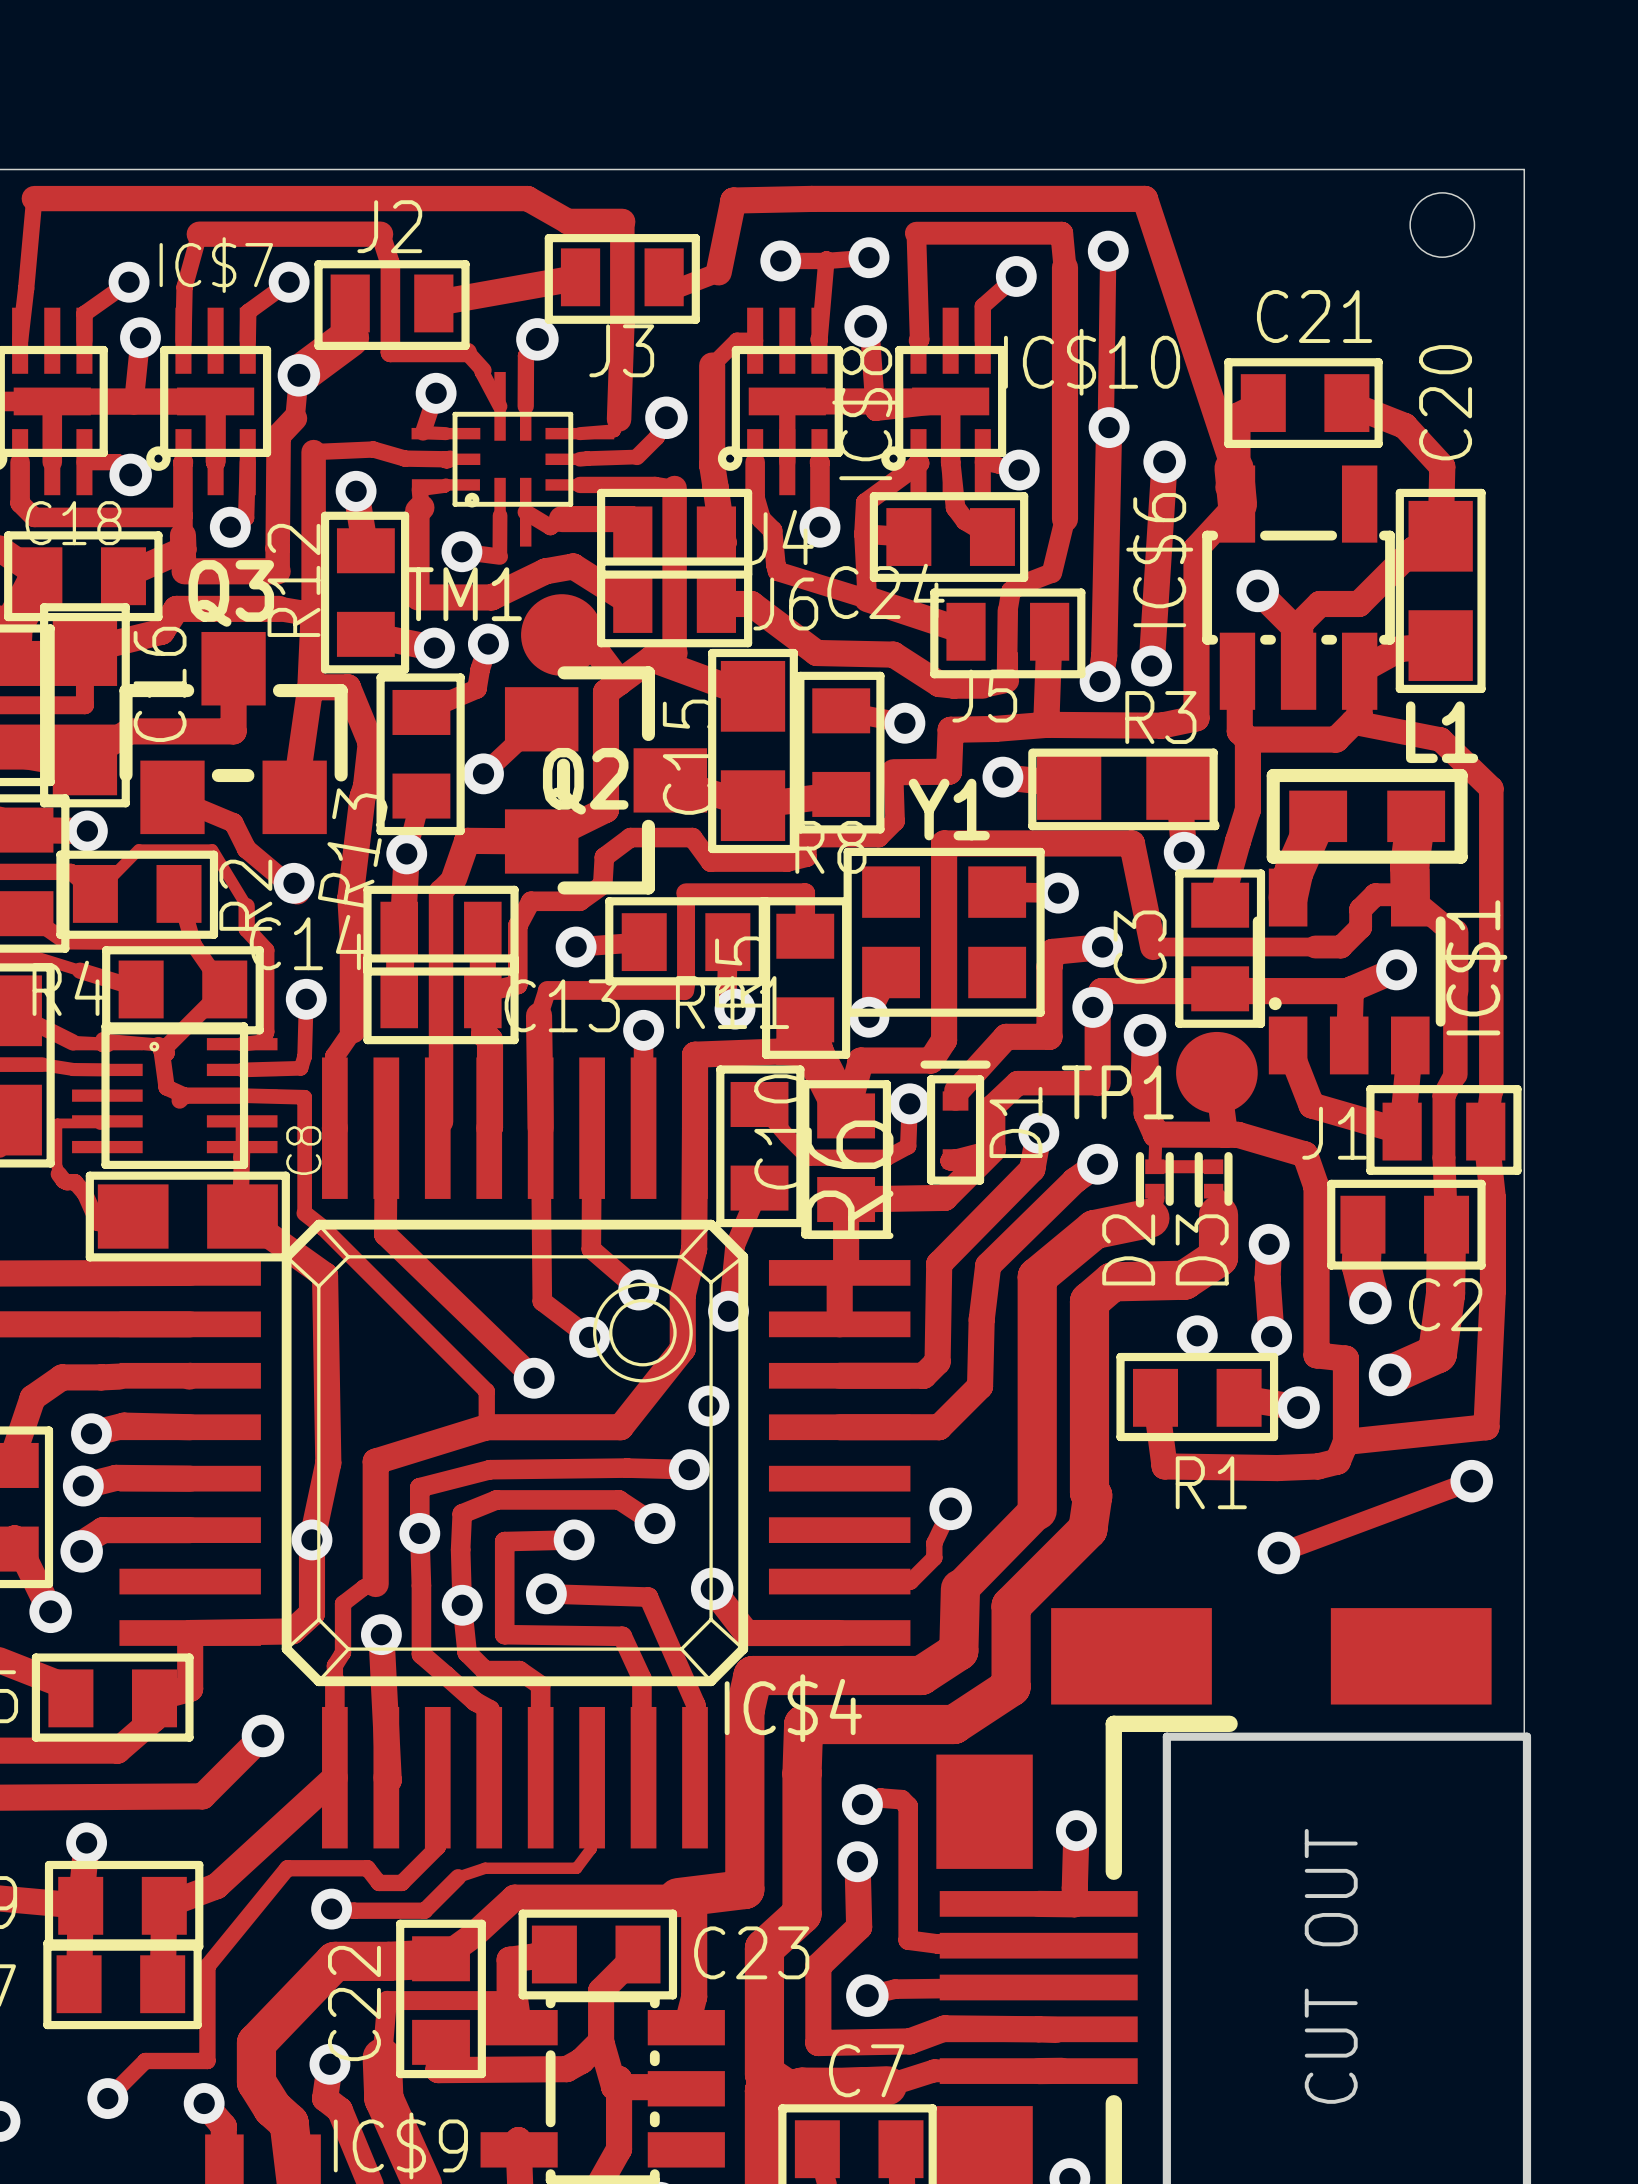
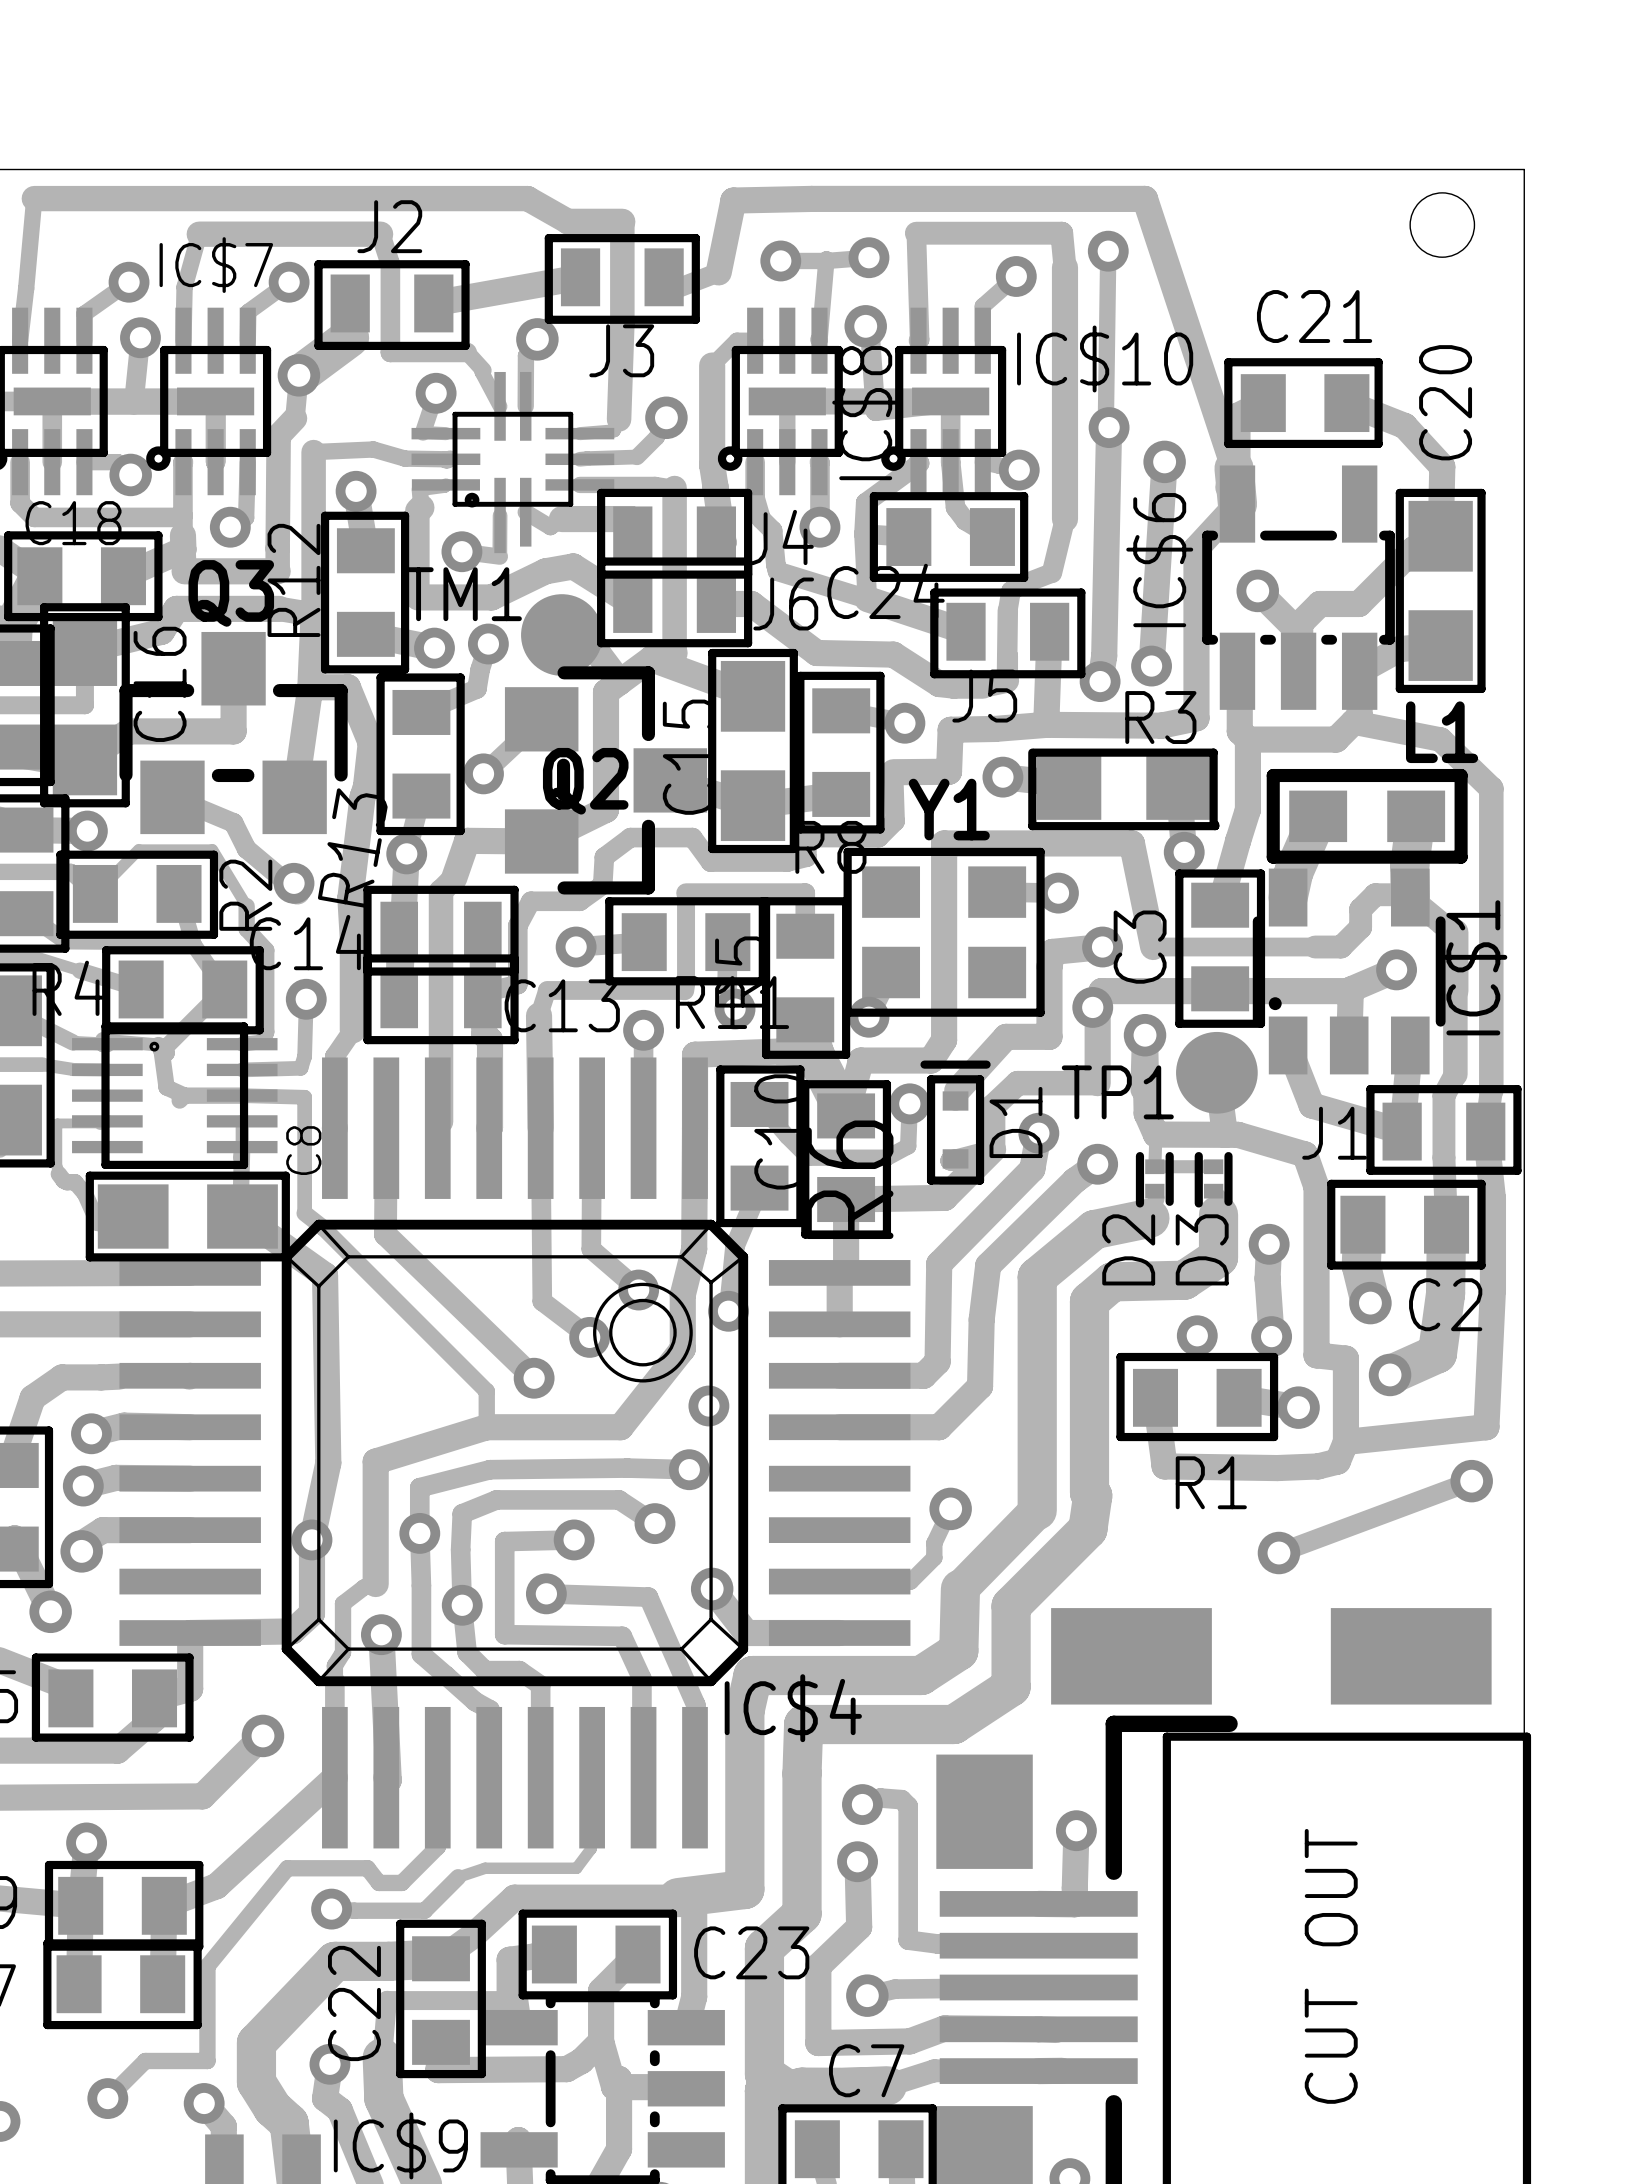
IC$10 name position: IC$10 (1092, 362) -> IC$10 (1105, 358)

